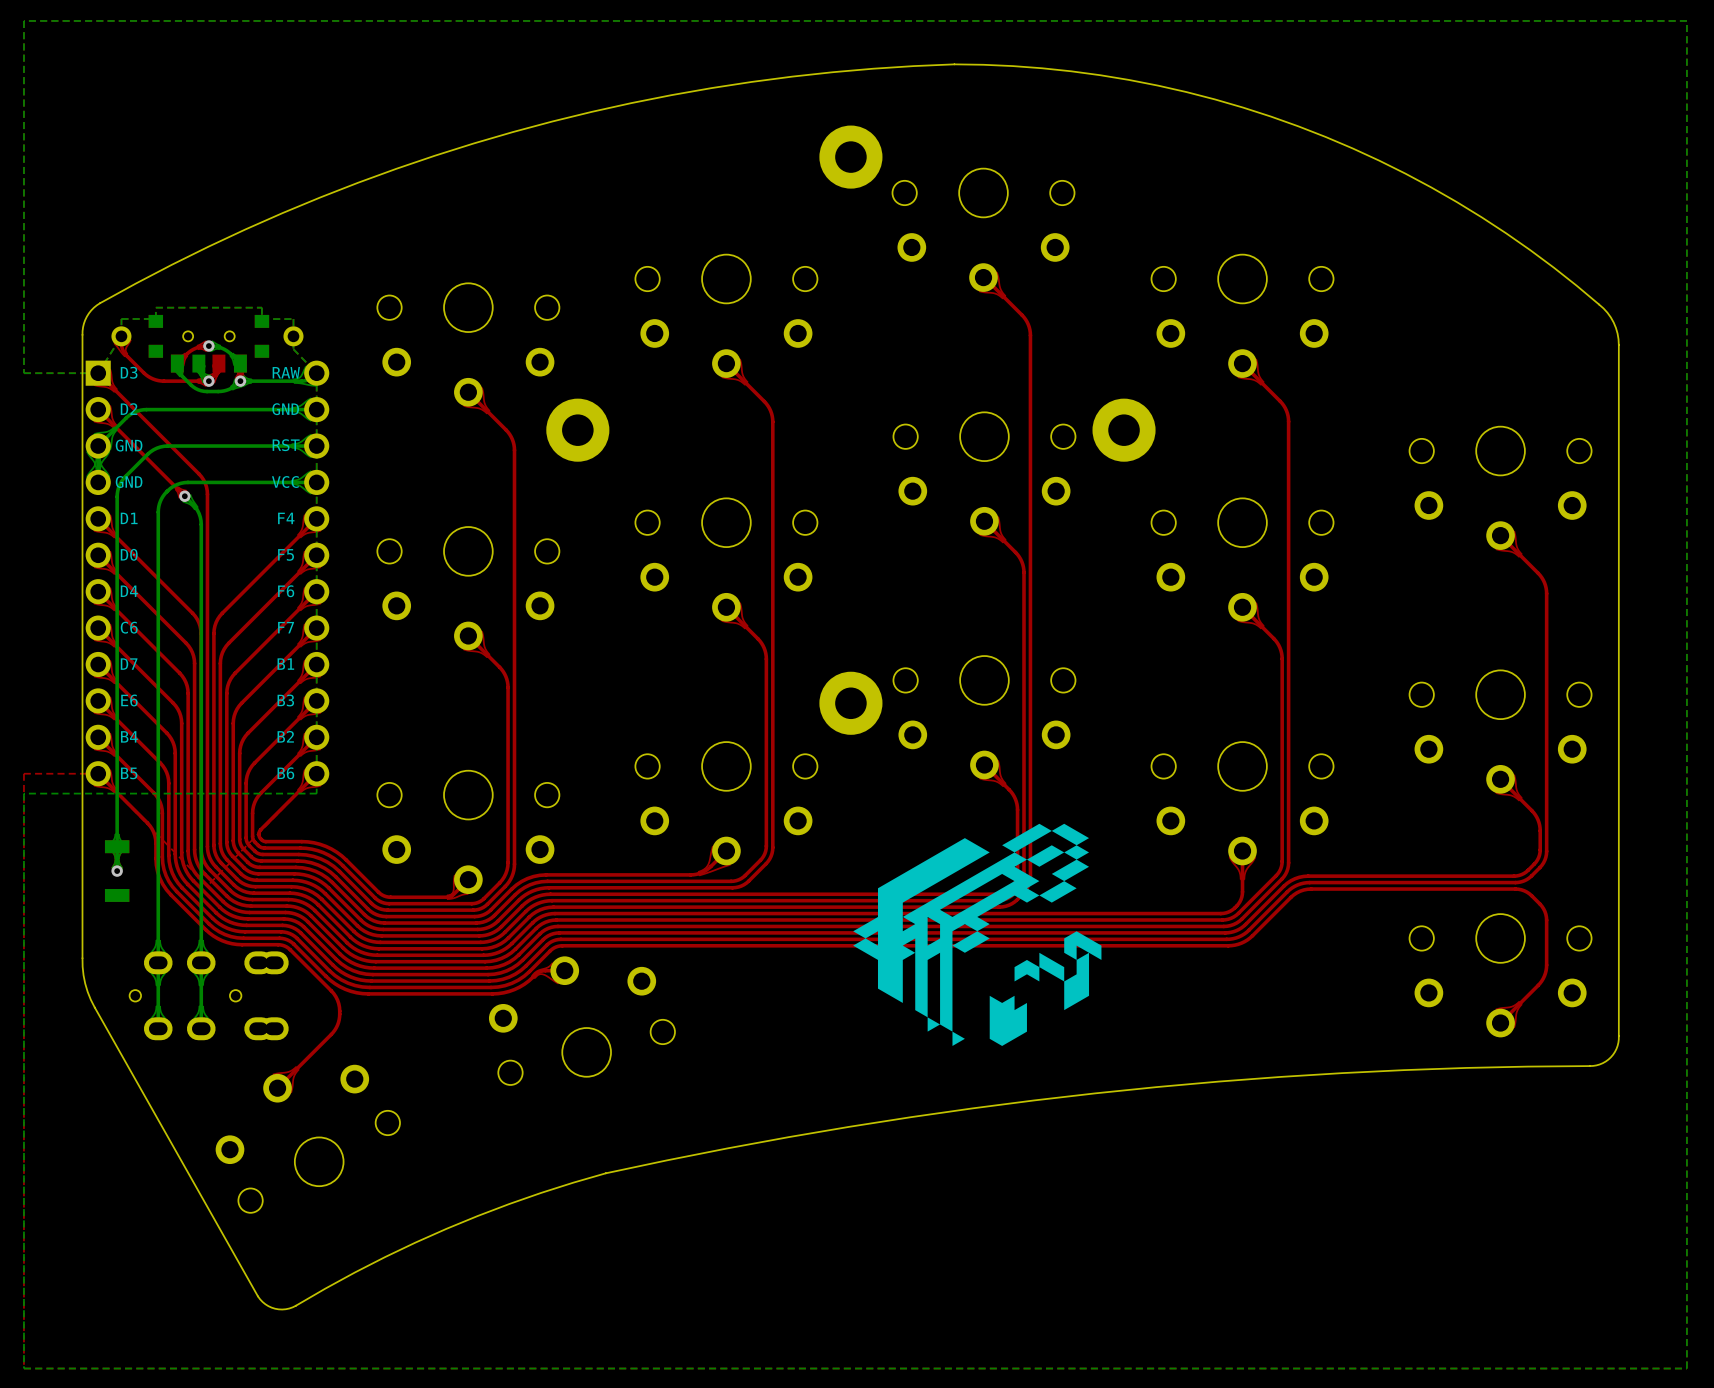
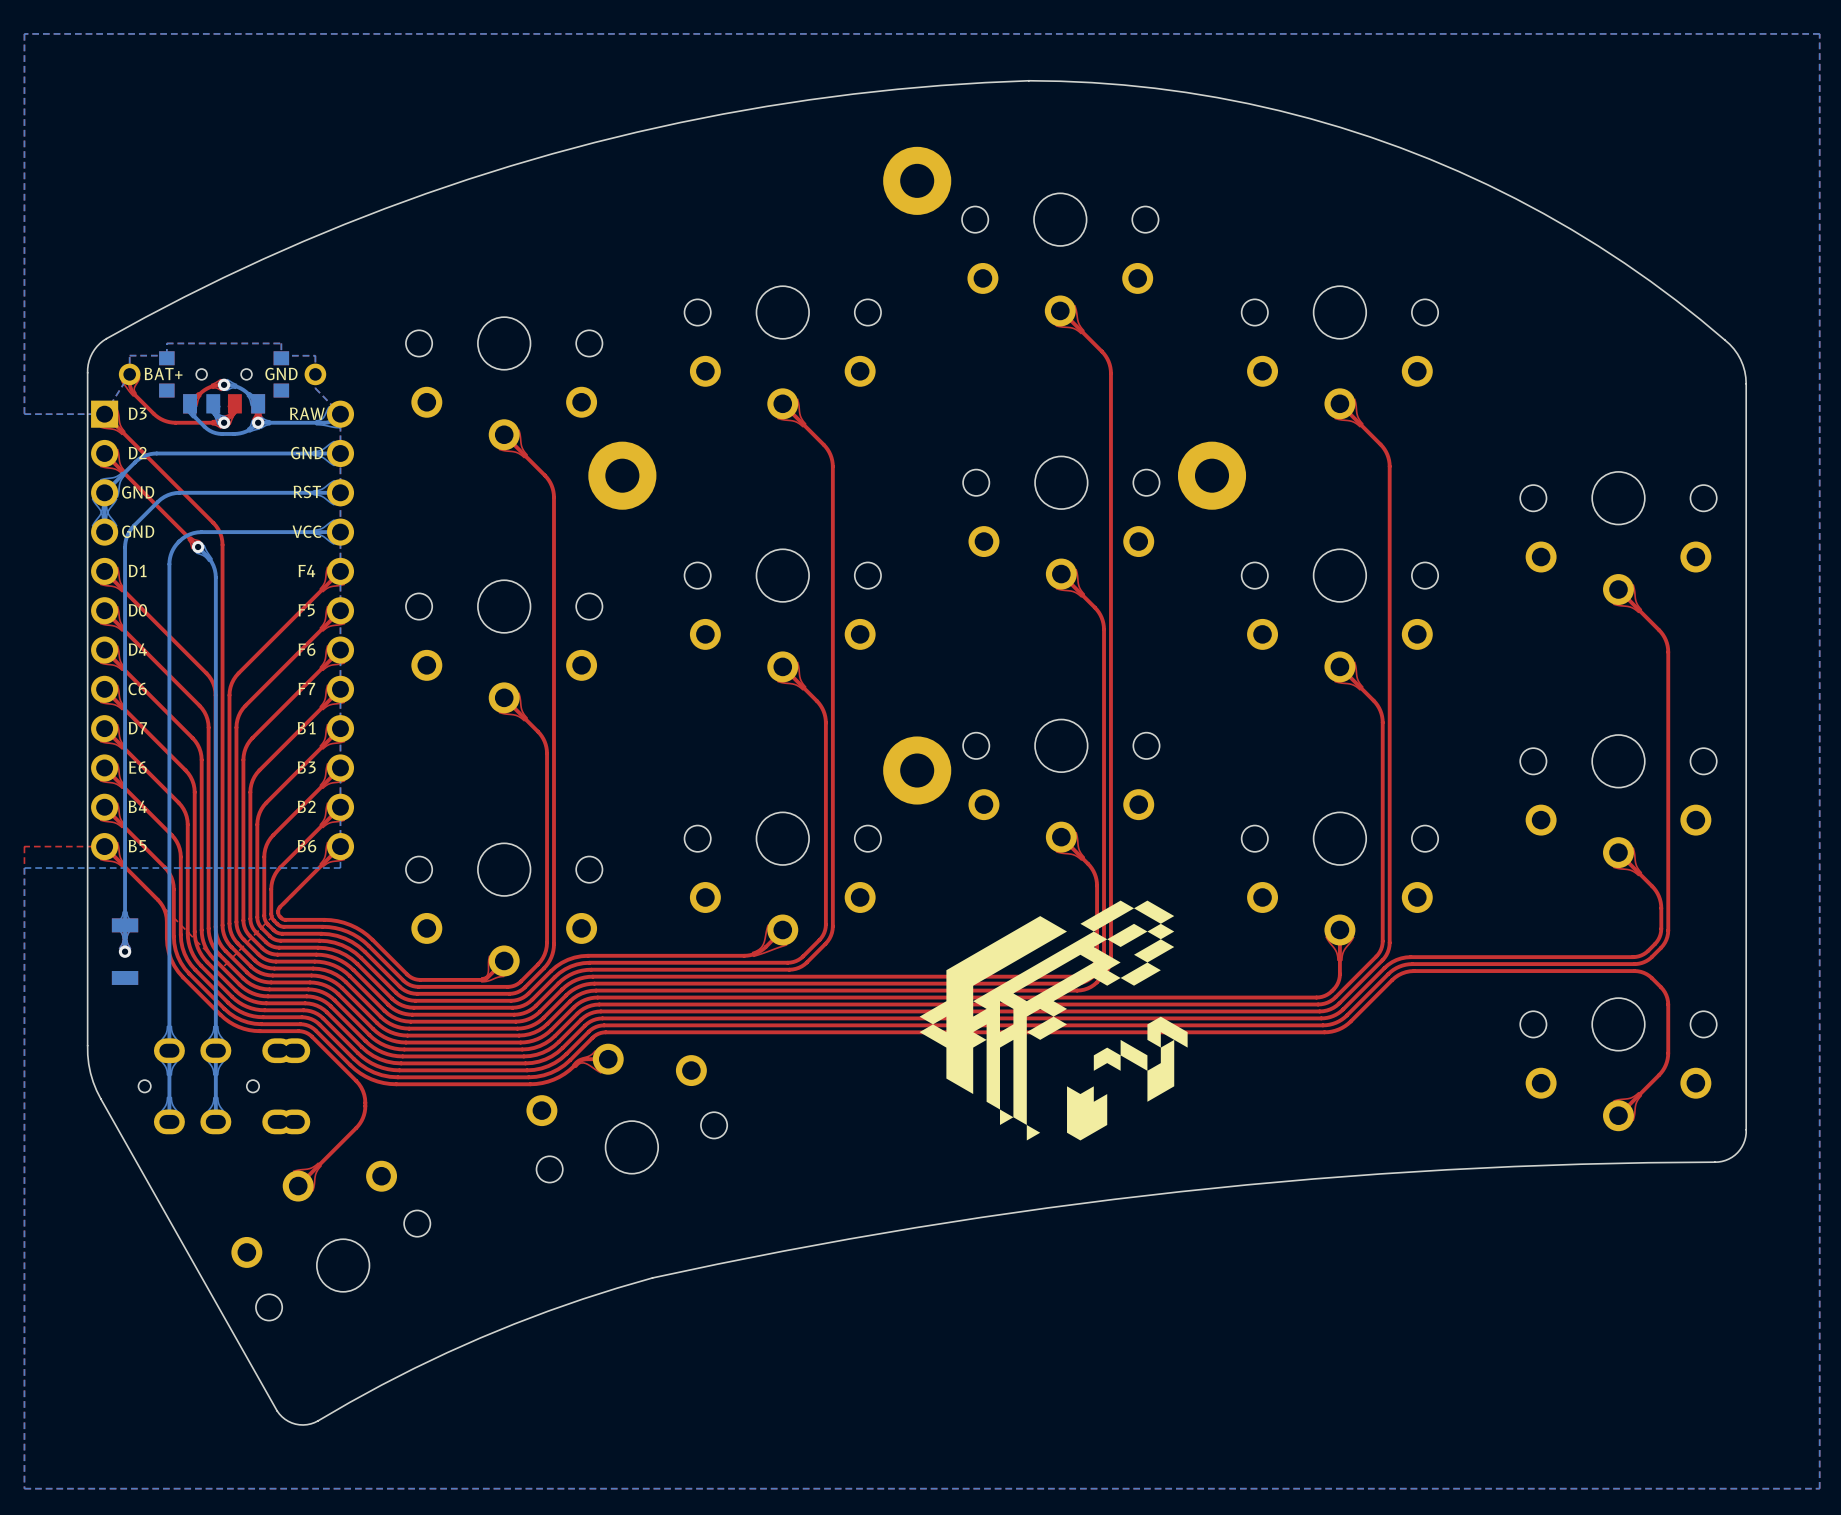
text: none -> BAT+ (163, 373)
text: none -> GND (281, 374)

